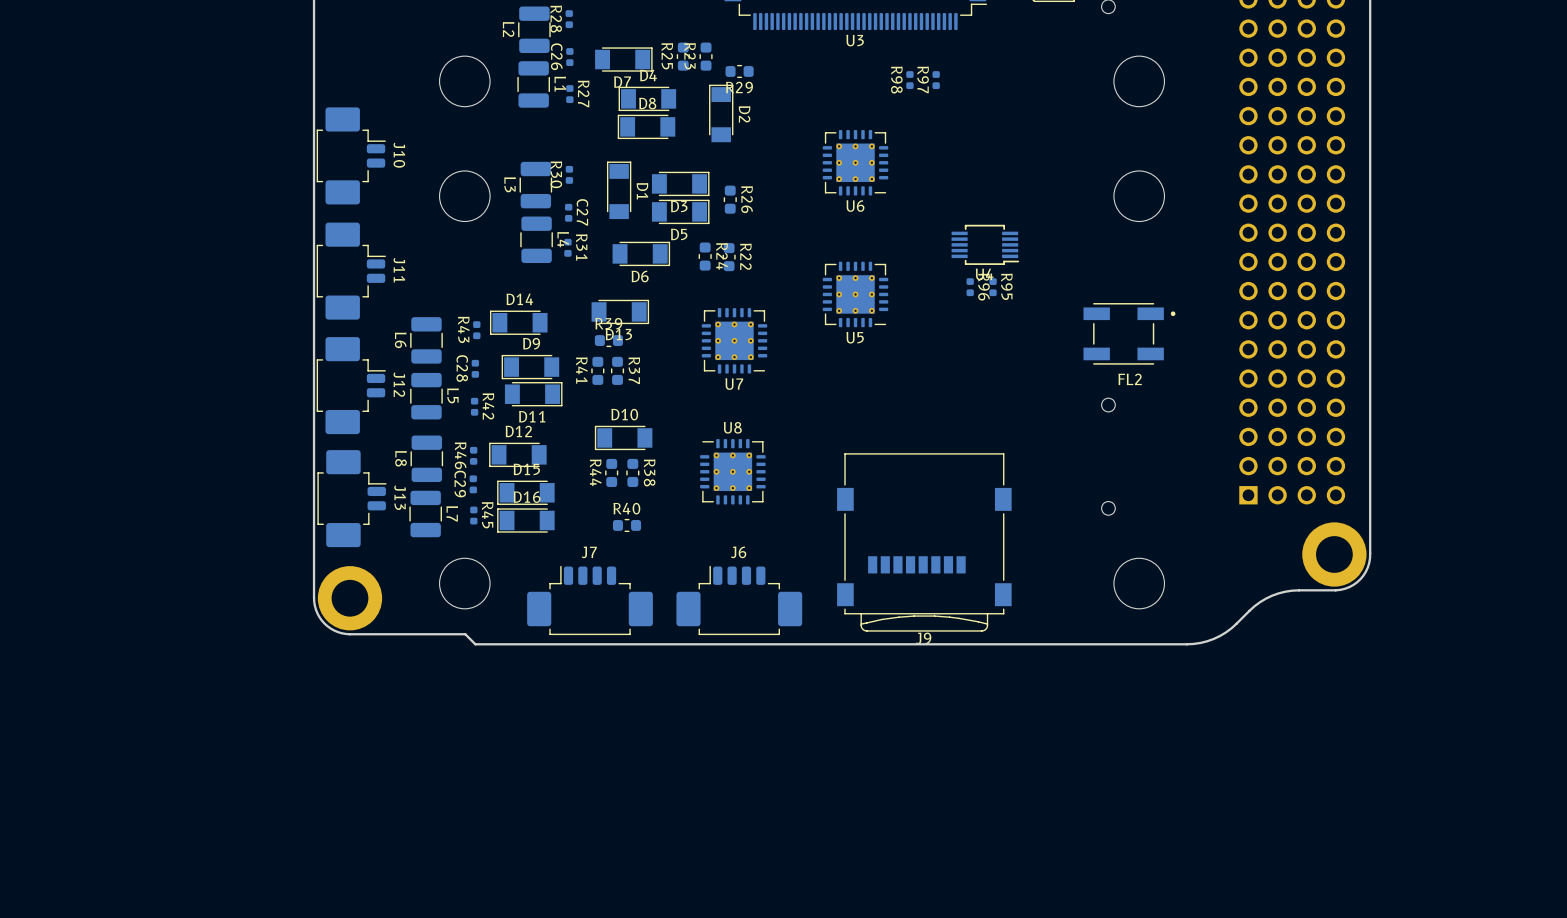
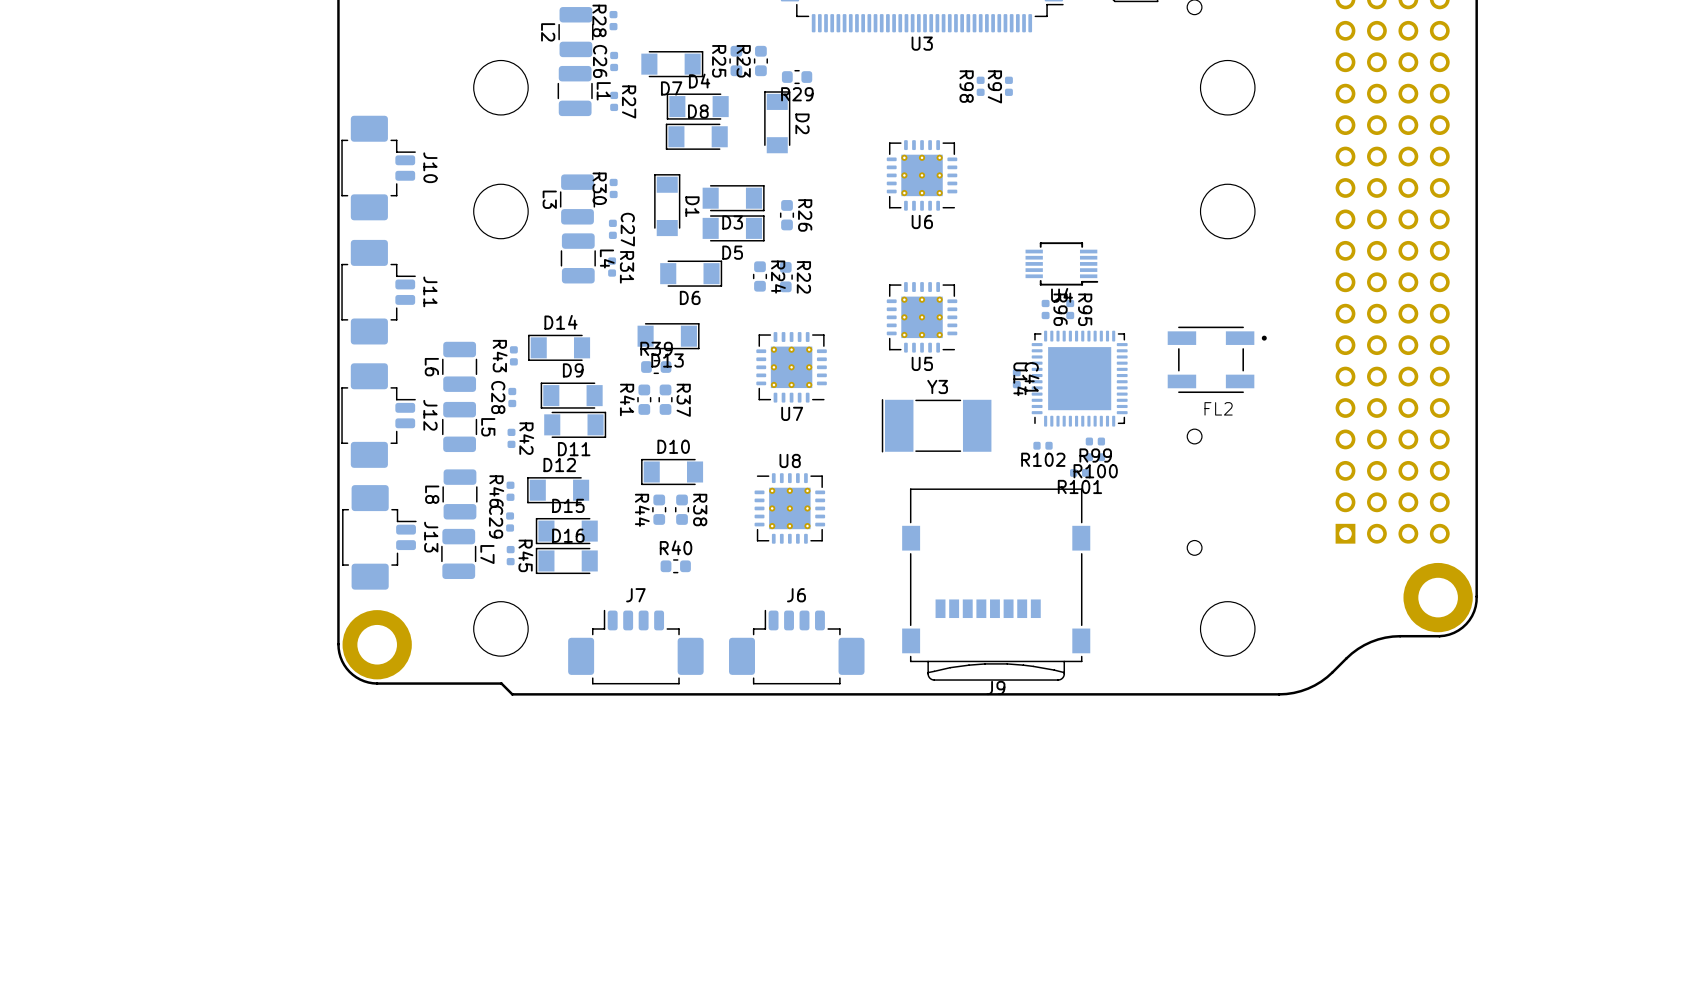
C41: none -> (1016, 378)
U14: none -> (1079, 378)
Y3: none -> (936, 425)
R99: none -> (1095, 441)
R102: none -> (1043, 445)
R100: none -> (1095, 457)
R101: none -> (1079, 472)

